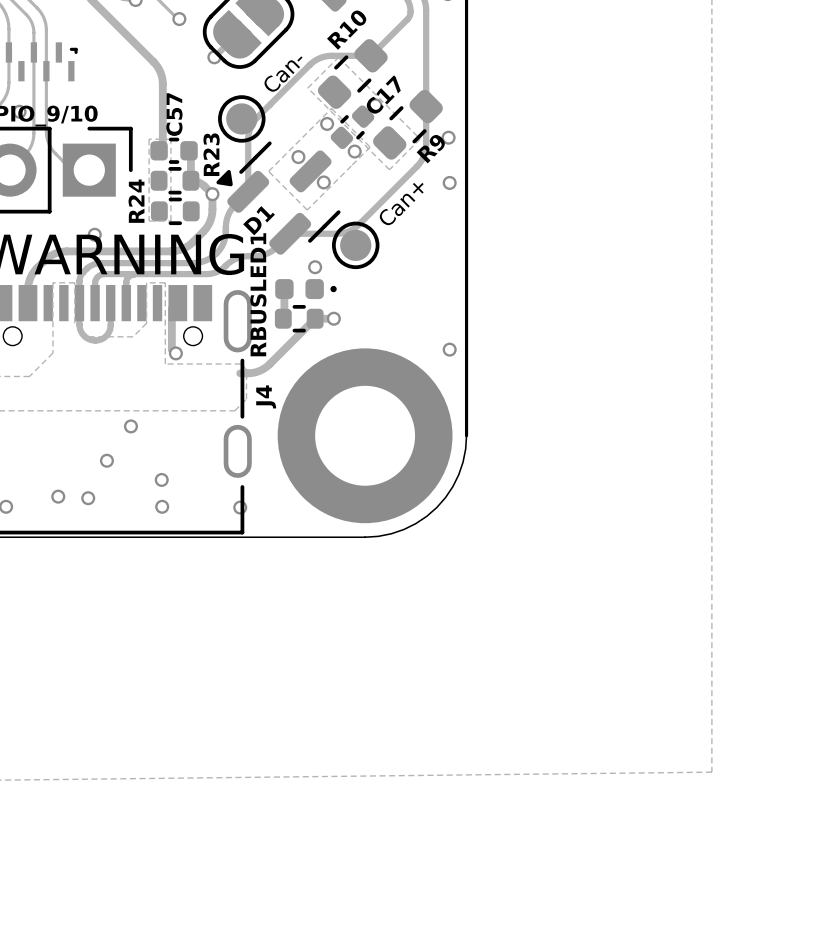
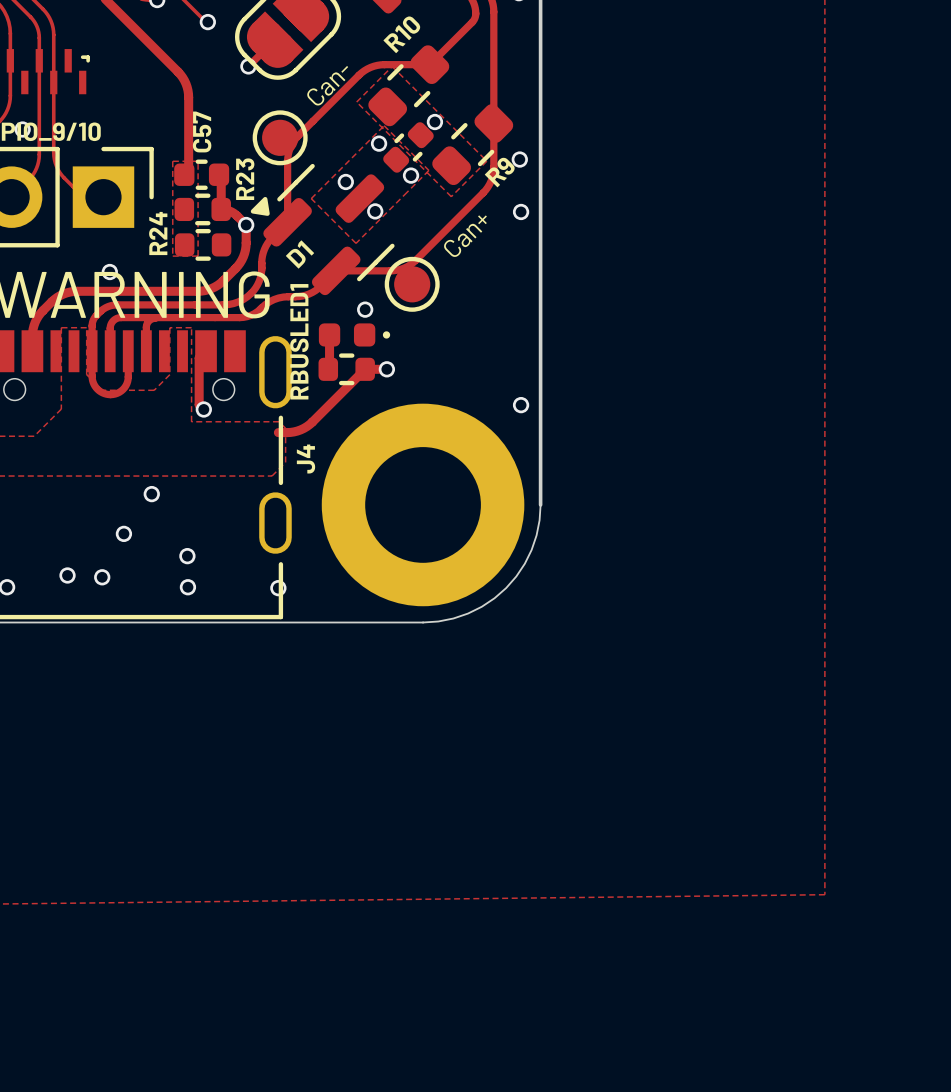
C17 name: C17 (383, 94) -> none

